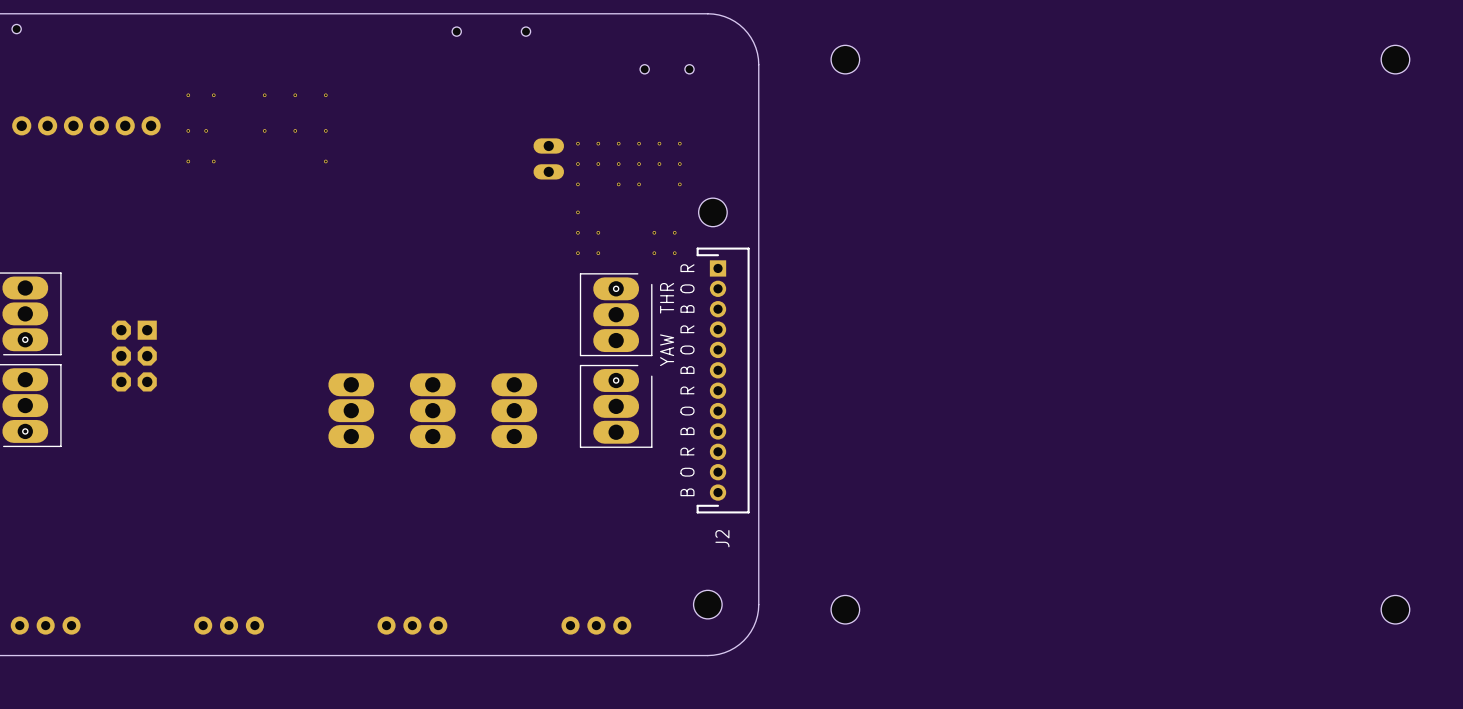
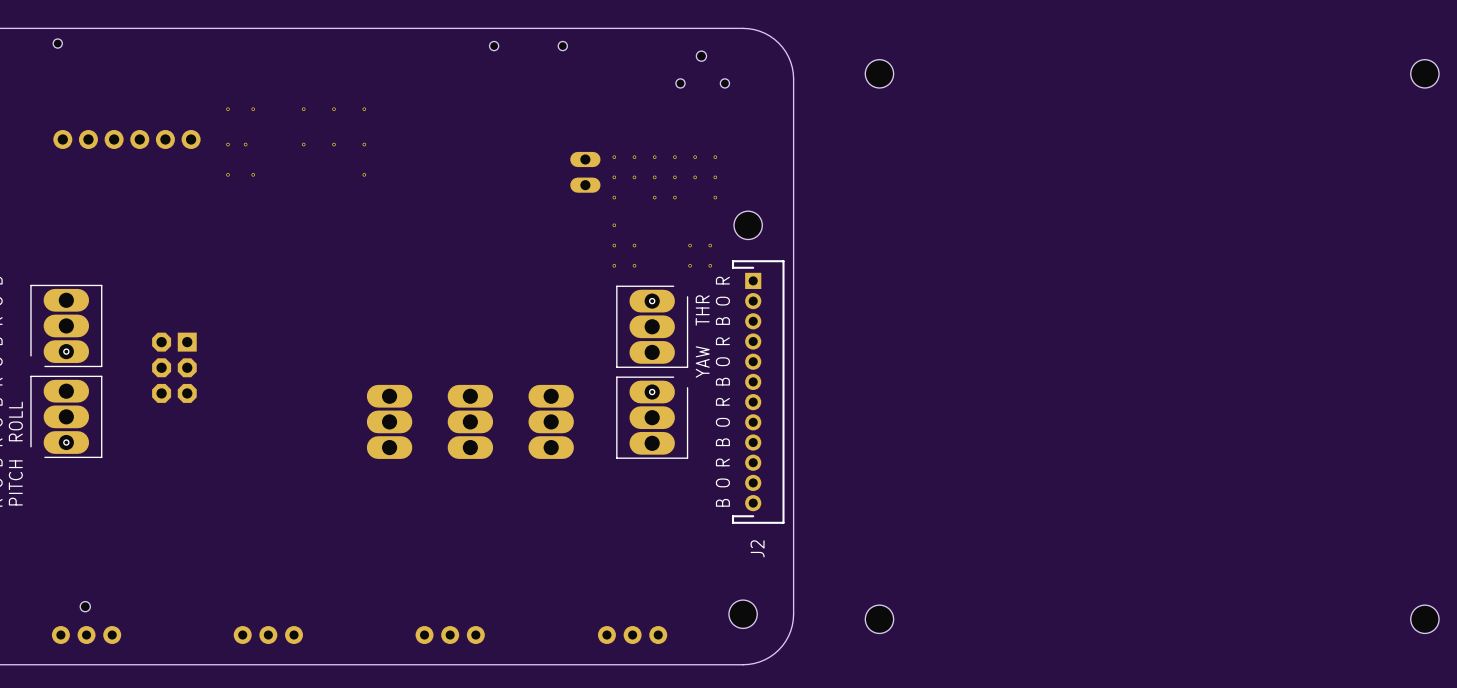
part: none -> (701, 56)
part: none -> (85, 606)

